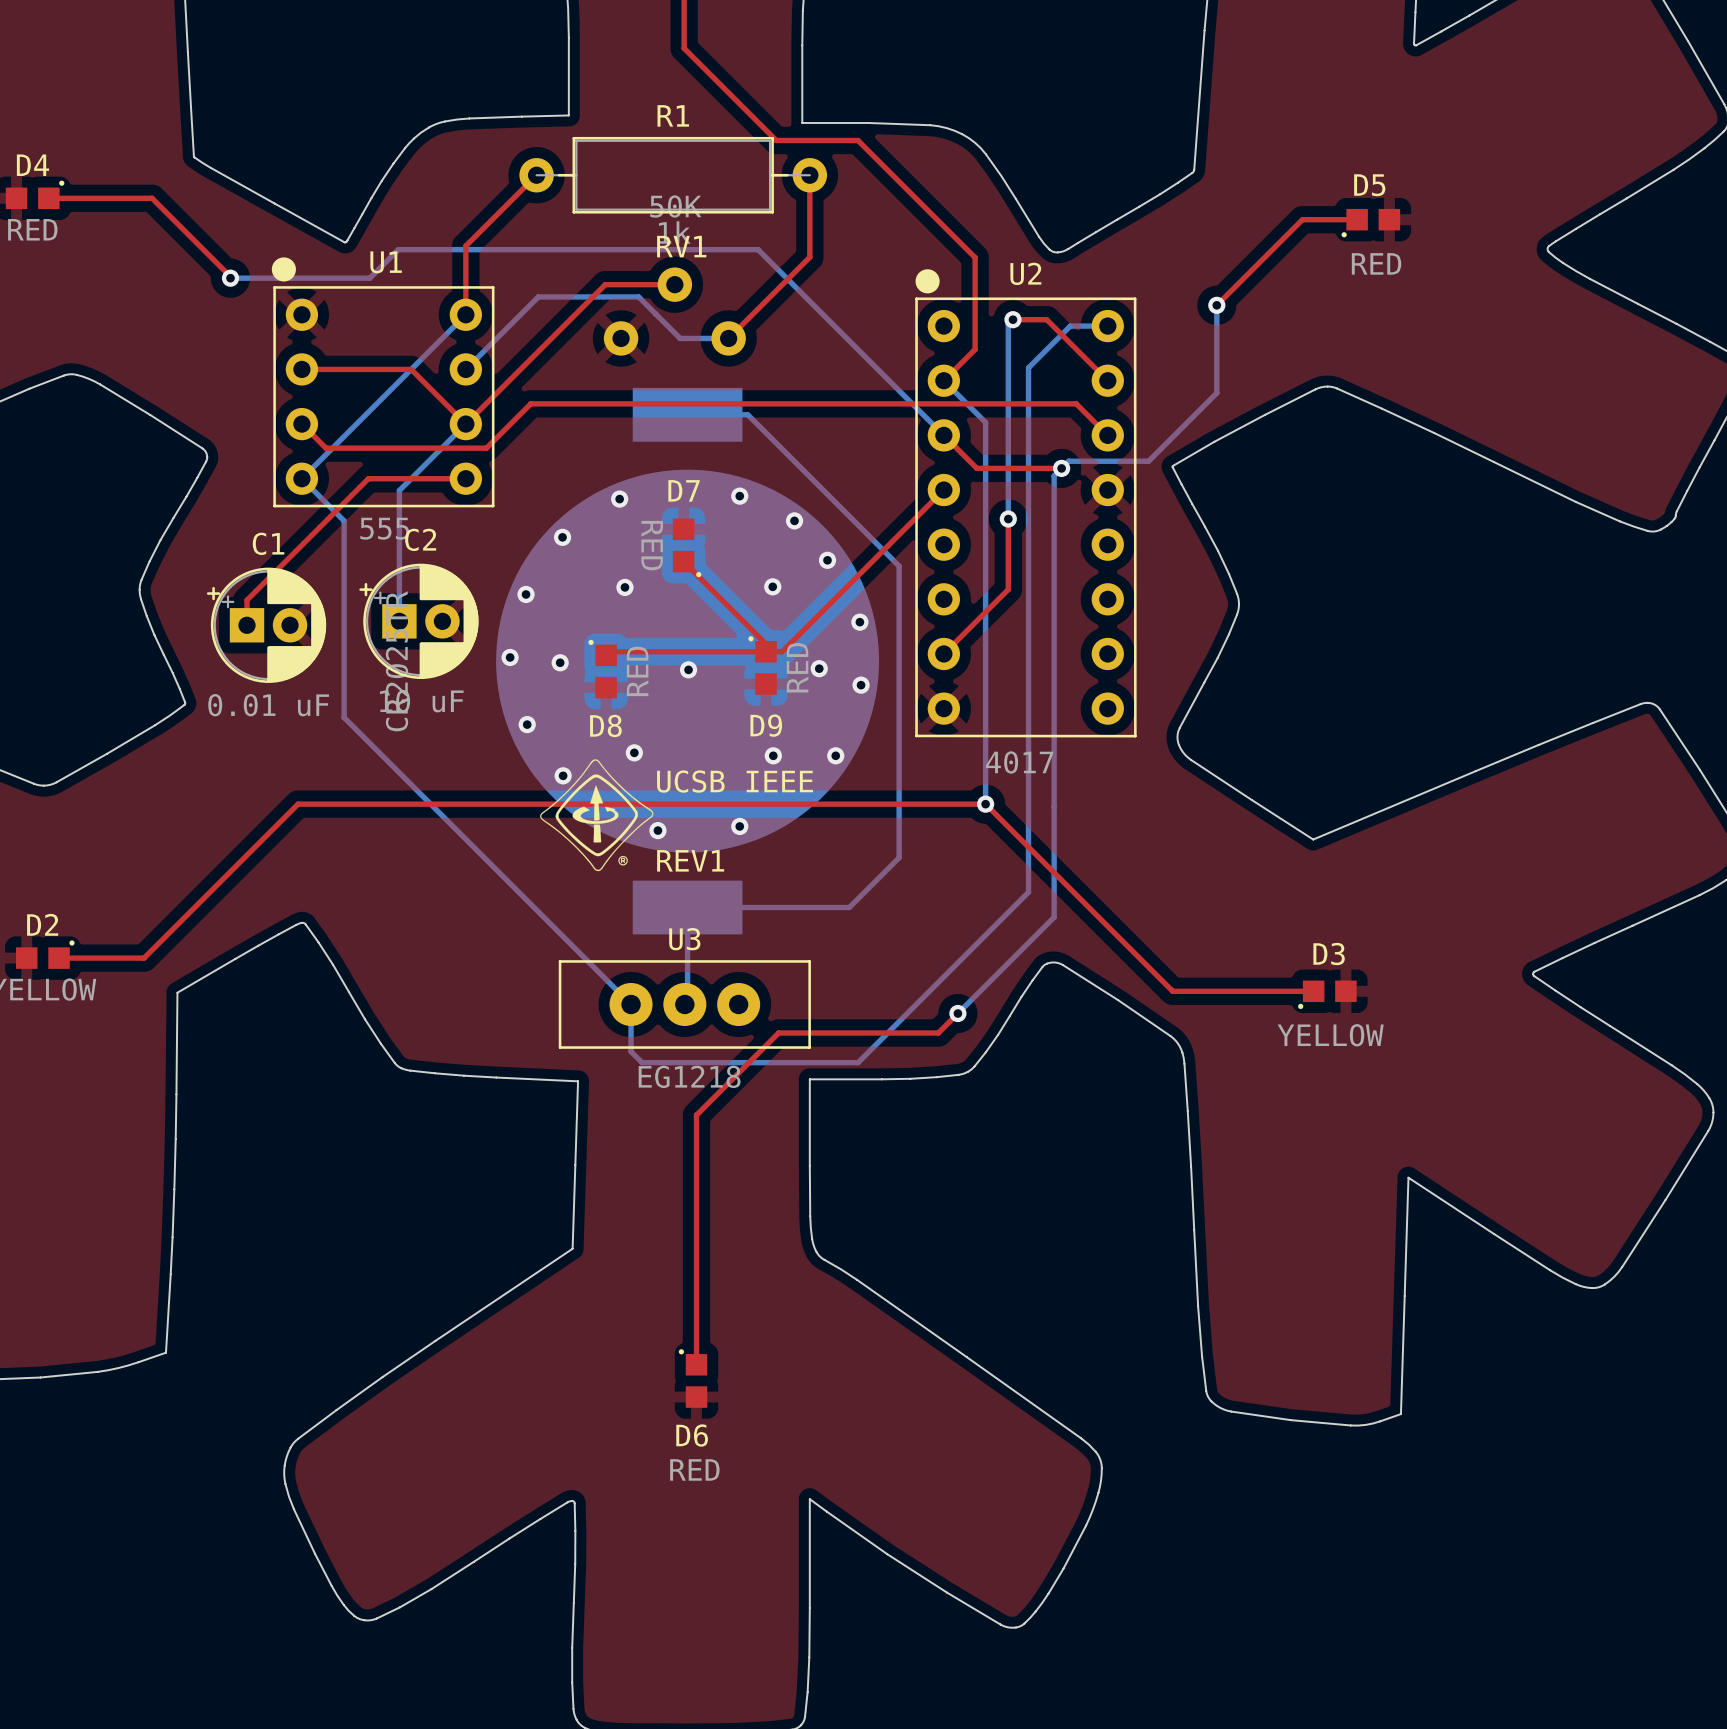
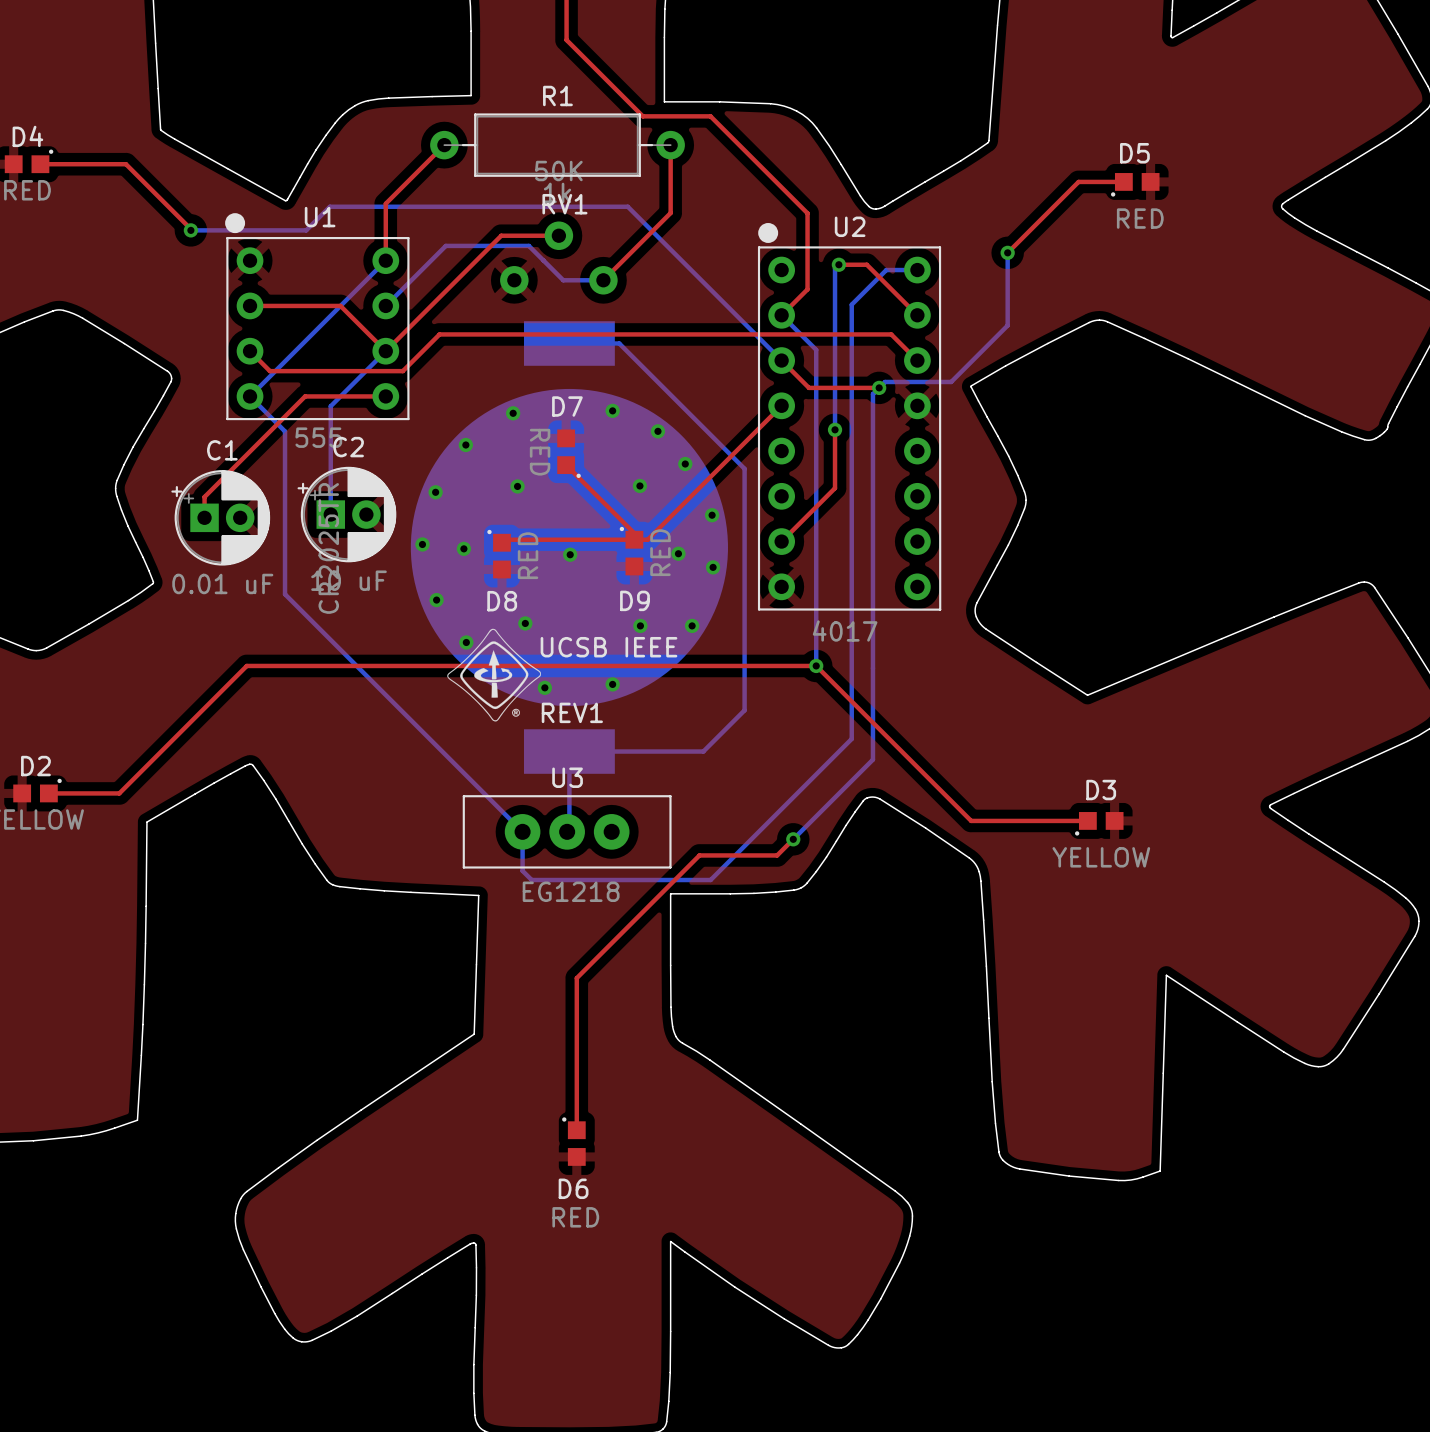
top track: (844, 1033) (778, 1033) (696, 1115) (696, 1181) -> (699, 855) (576, 978)

